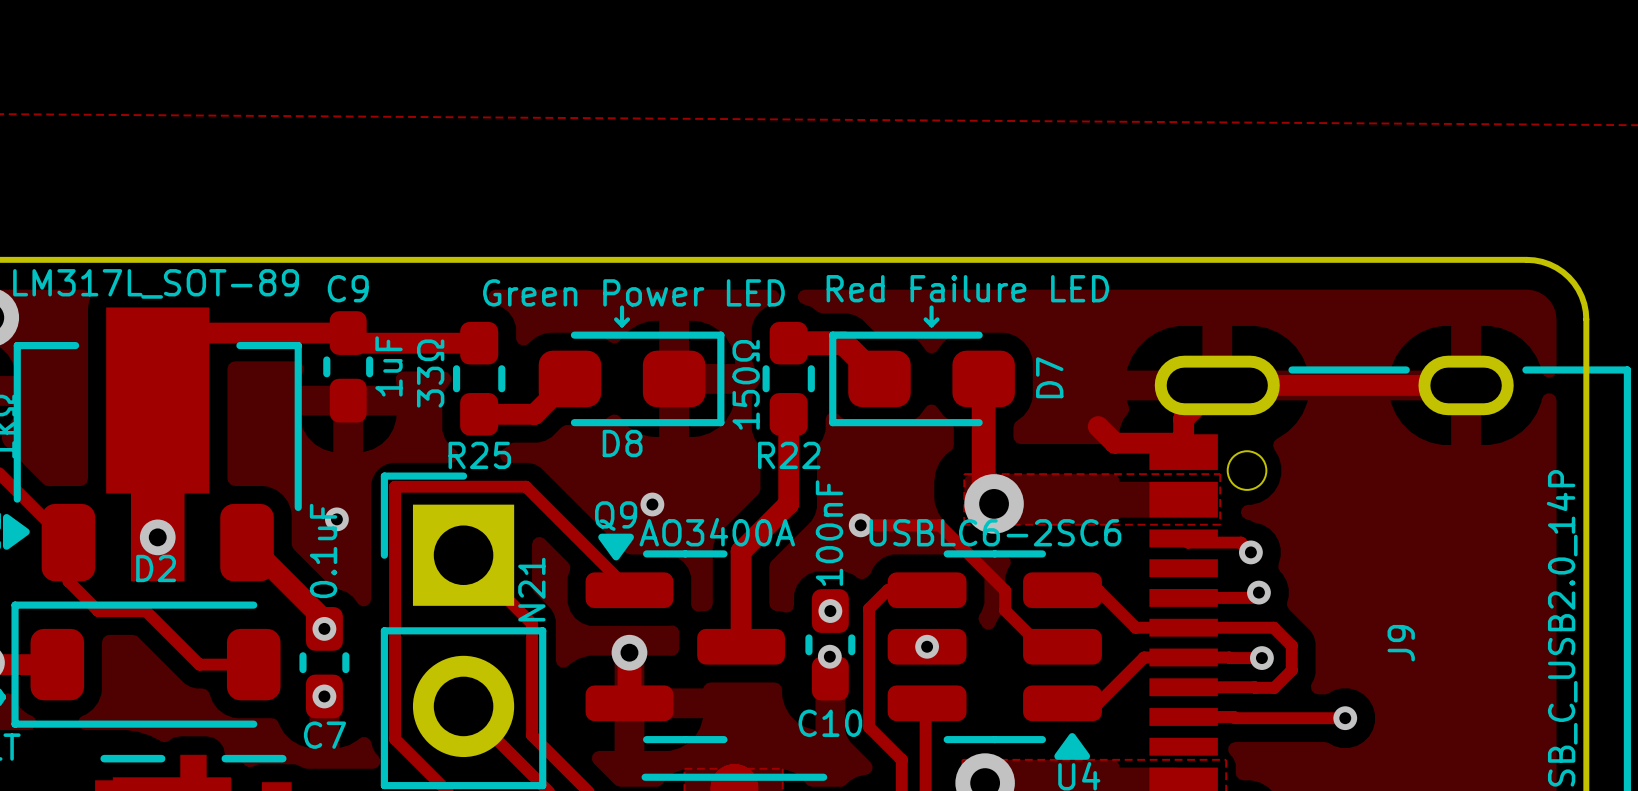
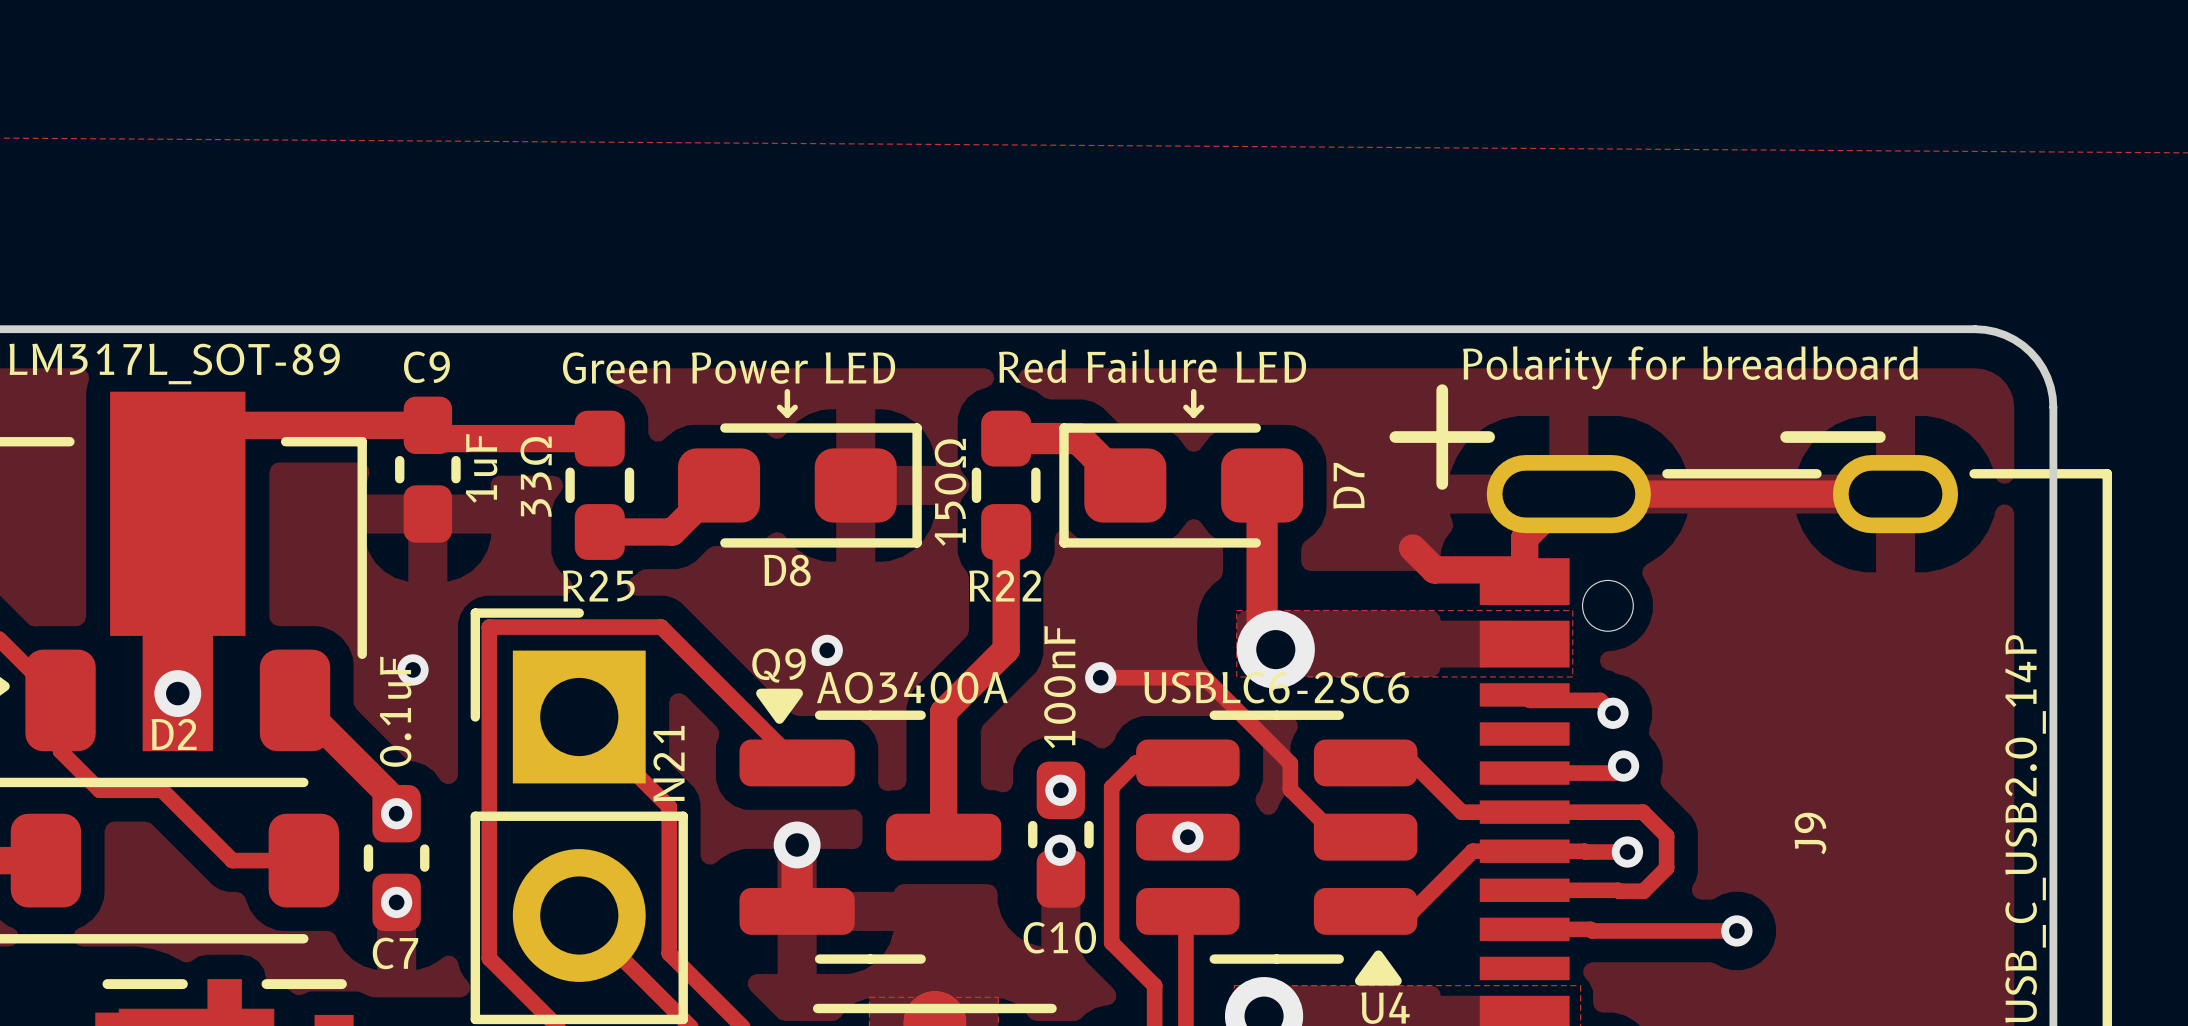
D7 value position: Red Failure LED (967, 288) -> Red Failure LED (1152, 366)
text: none -> Polarity for breadboard (1690, 367)
D8 value position: Green Power LED (633, 292) -> Green Power LED (729, 368)
line: none -> (1442, 390) (1442, 483)
line: none -> (1395, 437) (1489, 437)
line: none -> (1786, 437) (1879, 437)

